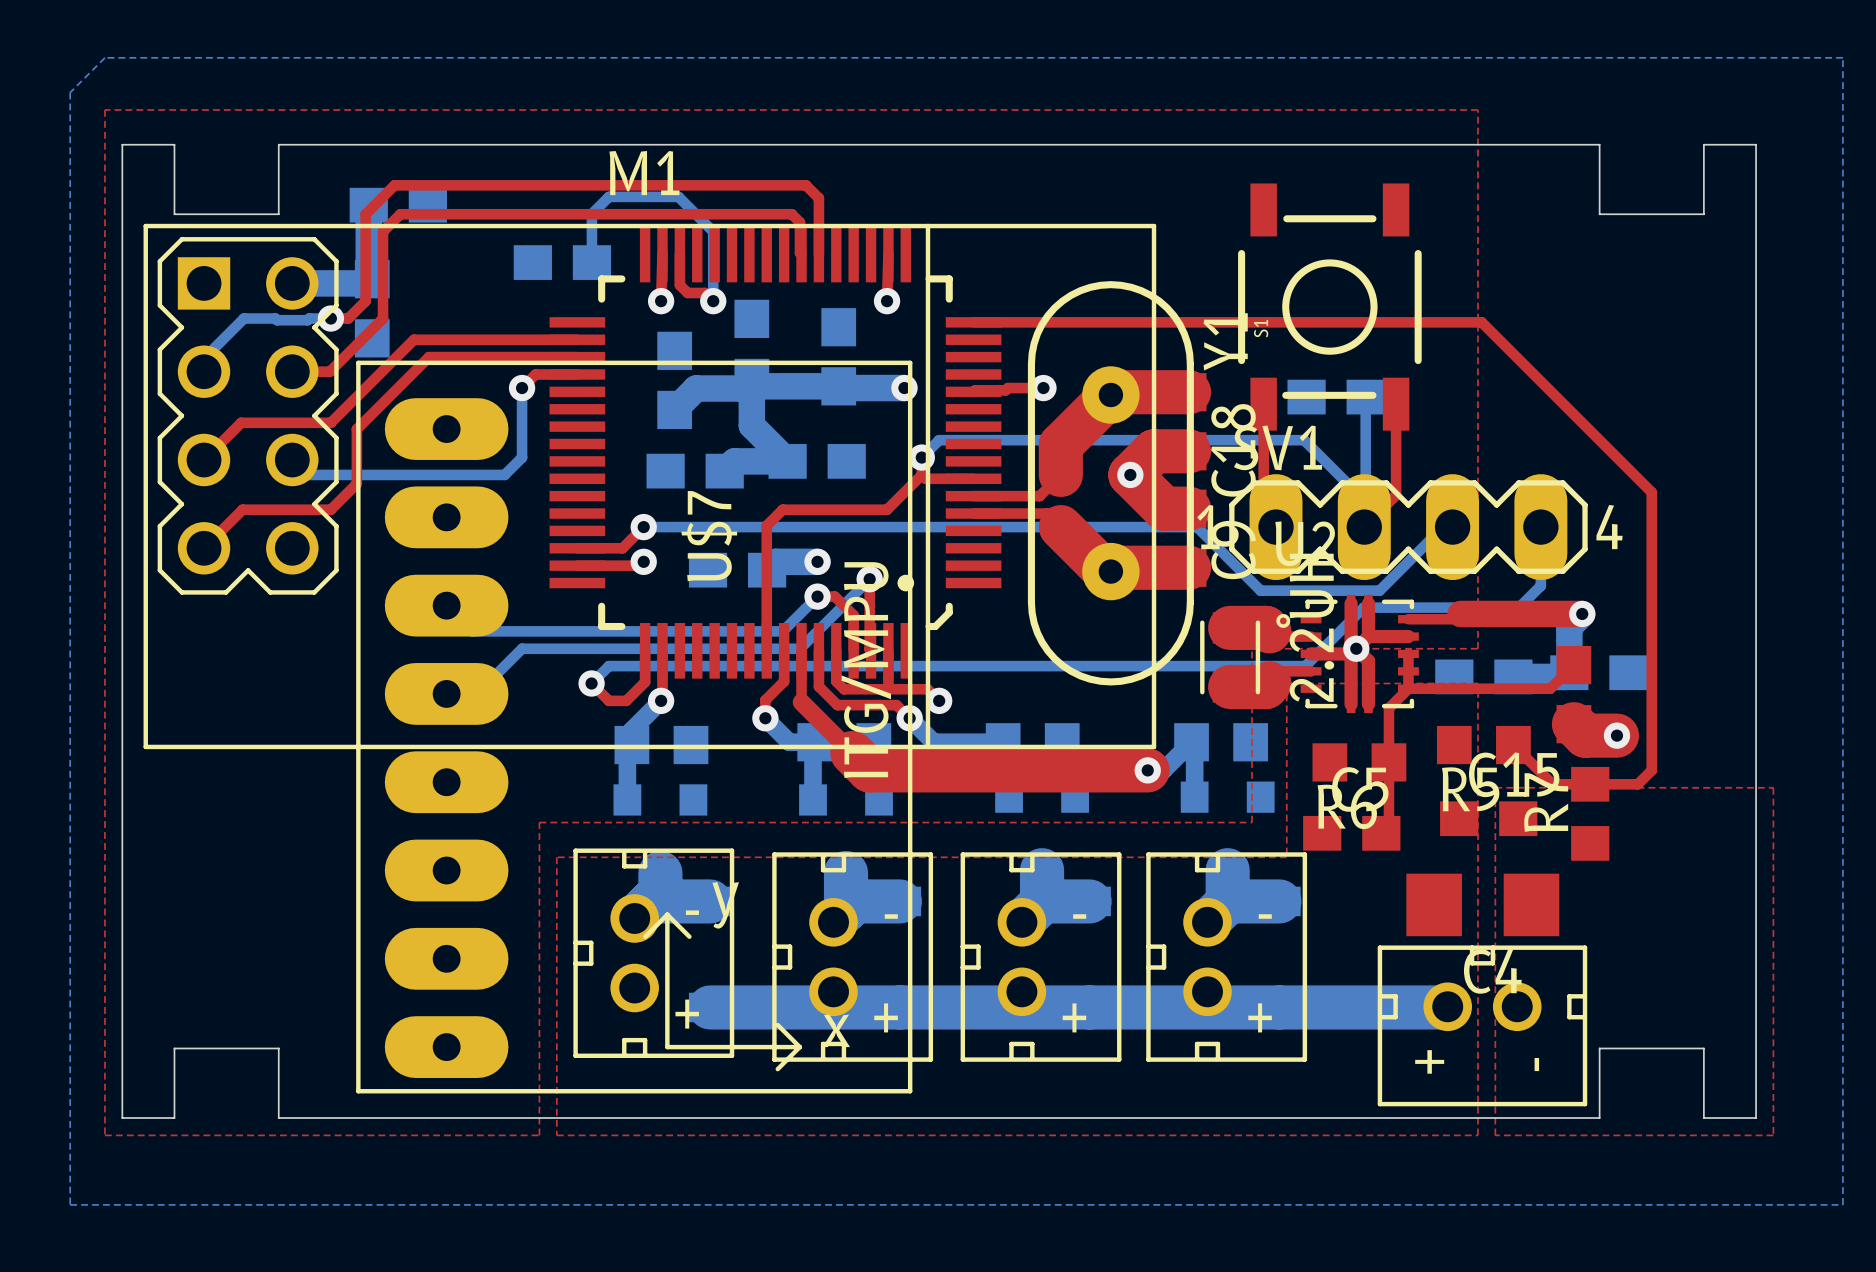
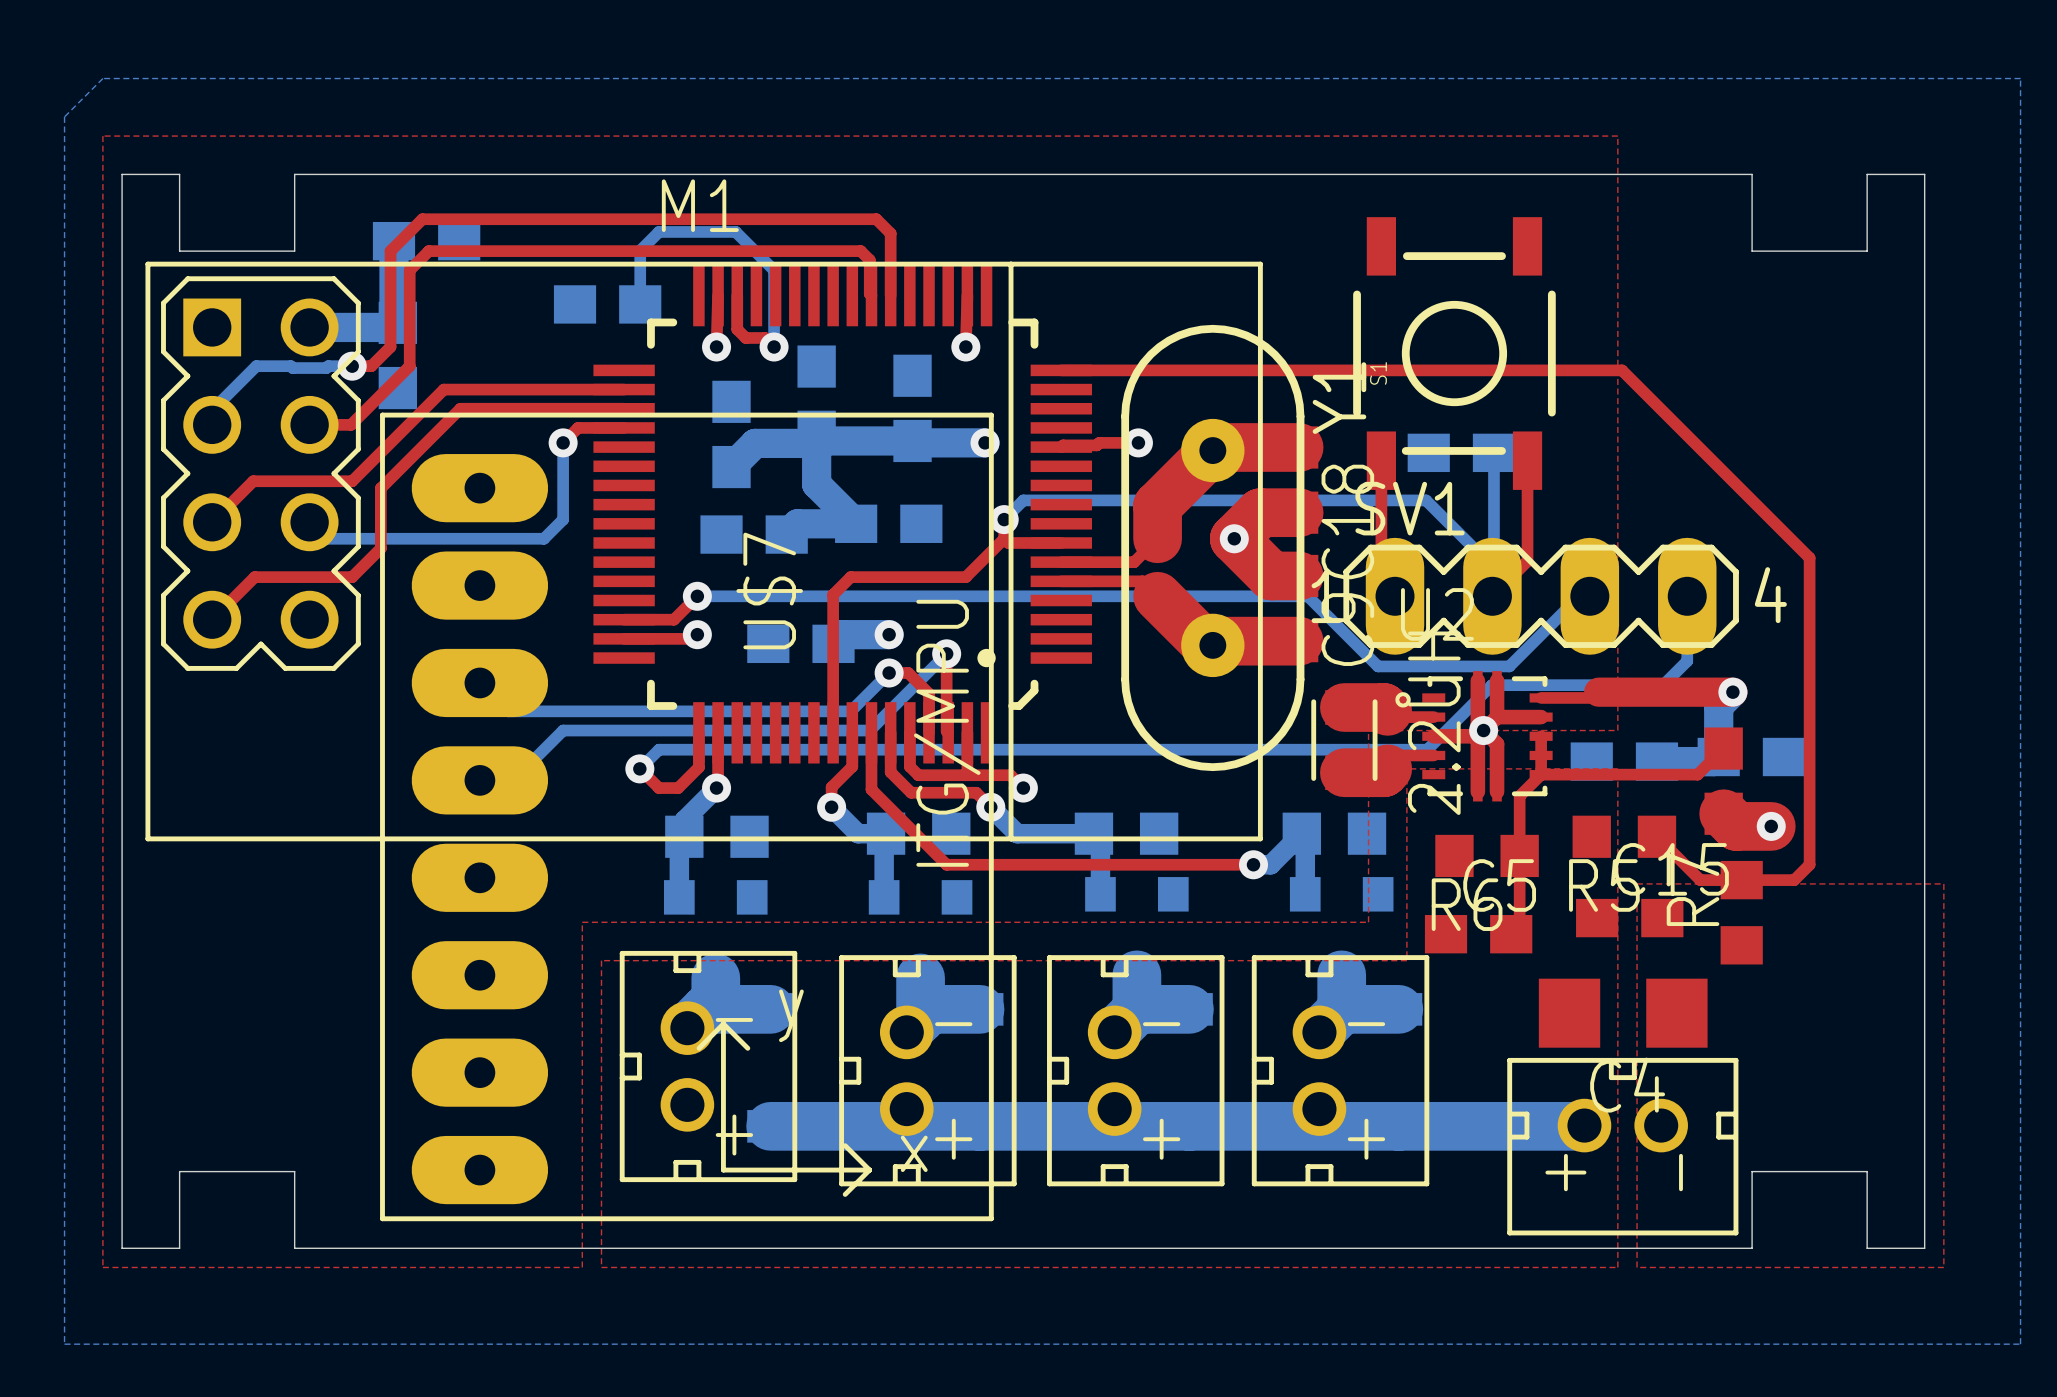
top track width: thick (801, 702) (869, 770) (1147, 770) -> thin (871, 789) (946, 864) (1253, 864)

